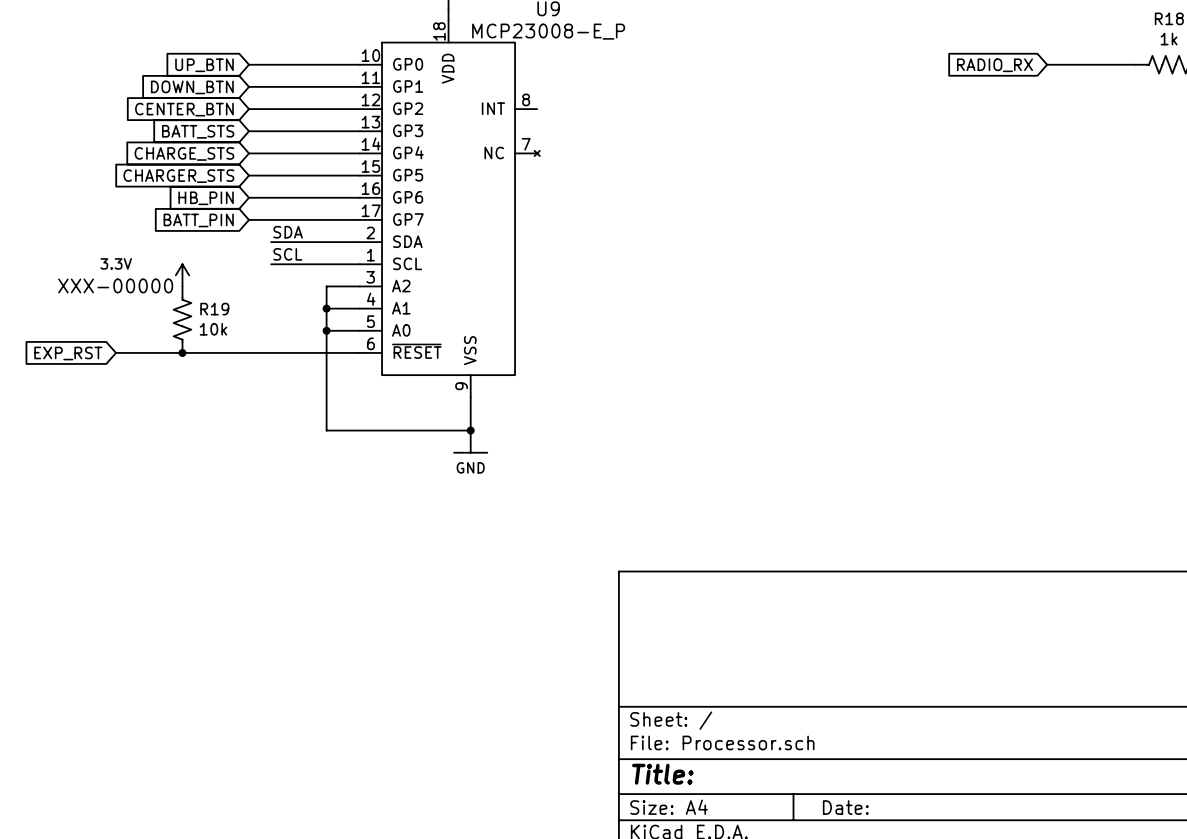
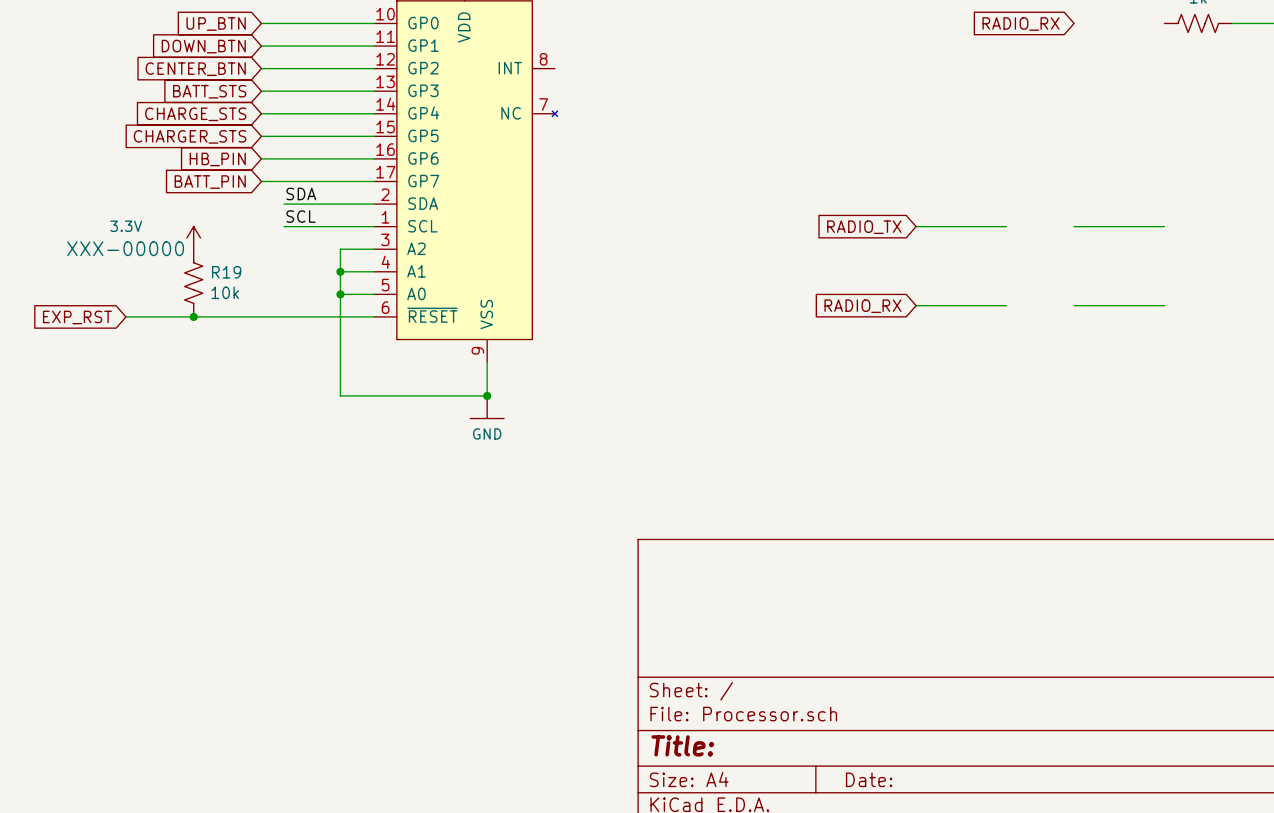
wire: (1047, 64) (1135, 64) -> (1074, 226) (1164, 226)
global label: none -> RADIO_TX (864, 227)
wire: none -> (916, 226) (1006, 226)
wire: none -> (916, 305) (1006, 305)
wire: none -> (1074, 305) (1164, 305)
global label: none -> RADIO_RX (863, 306)

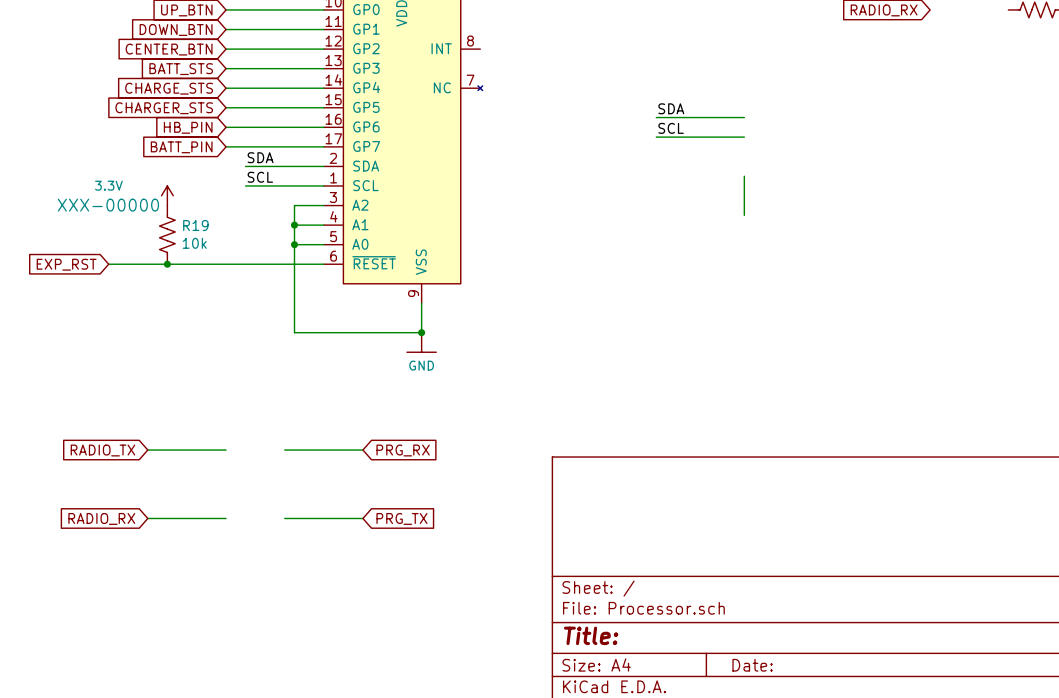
label: none -> SDA (671, 108)
wire: none -> (656, 117) (744, 117)
label: none -> SCL (671, 128)
wire: none -> (656, 137) (744, 137)
wire: none -> (744, 176) (744, 215)
wire: (916, 226) (1006, 226) -> none
wire: (1074, 226) (1164, 226) -> none
global label: RADIO_TX (864, 227) -> none
wire: (916, 305) (1006, 305) -> none
wire: (1074, 305) (1164, 305) -> none
global label: RADIO_RX (863, 306) -> none
global label: none -> RADIO_TX (102, 450)
wire: none -> (147, 450) (226, 450)
wire: none -> (284, 450) (362, 450)
global label: none -> PRG_RX (403, 450)
global label: none -> RADIO_RX (101, 518)
wire: none -> (147, 518) (226, 518)
wire: none -> (284, 518) (362, 518)
global label: none -> PRG_TX (401, 518)

